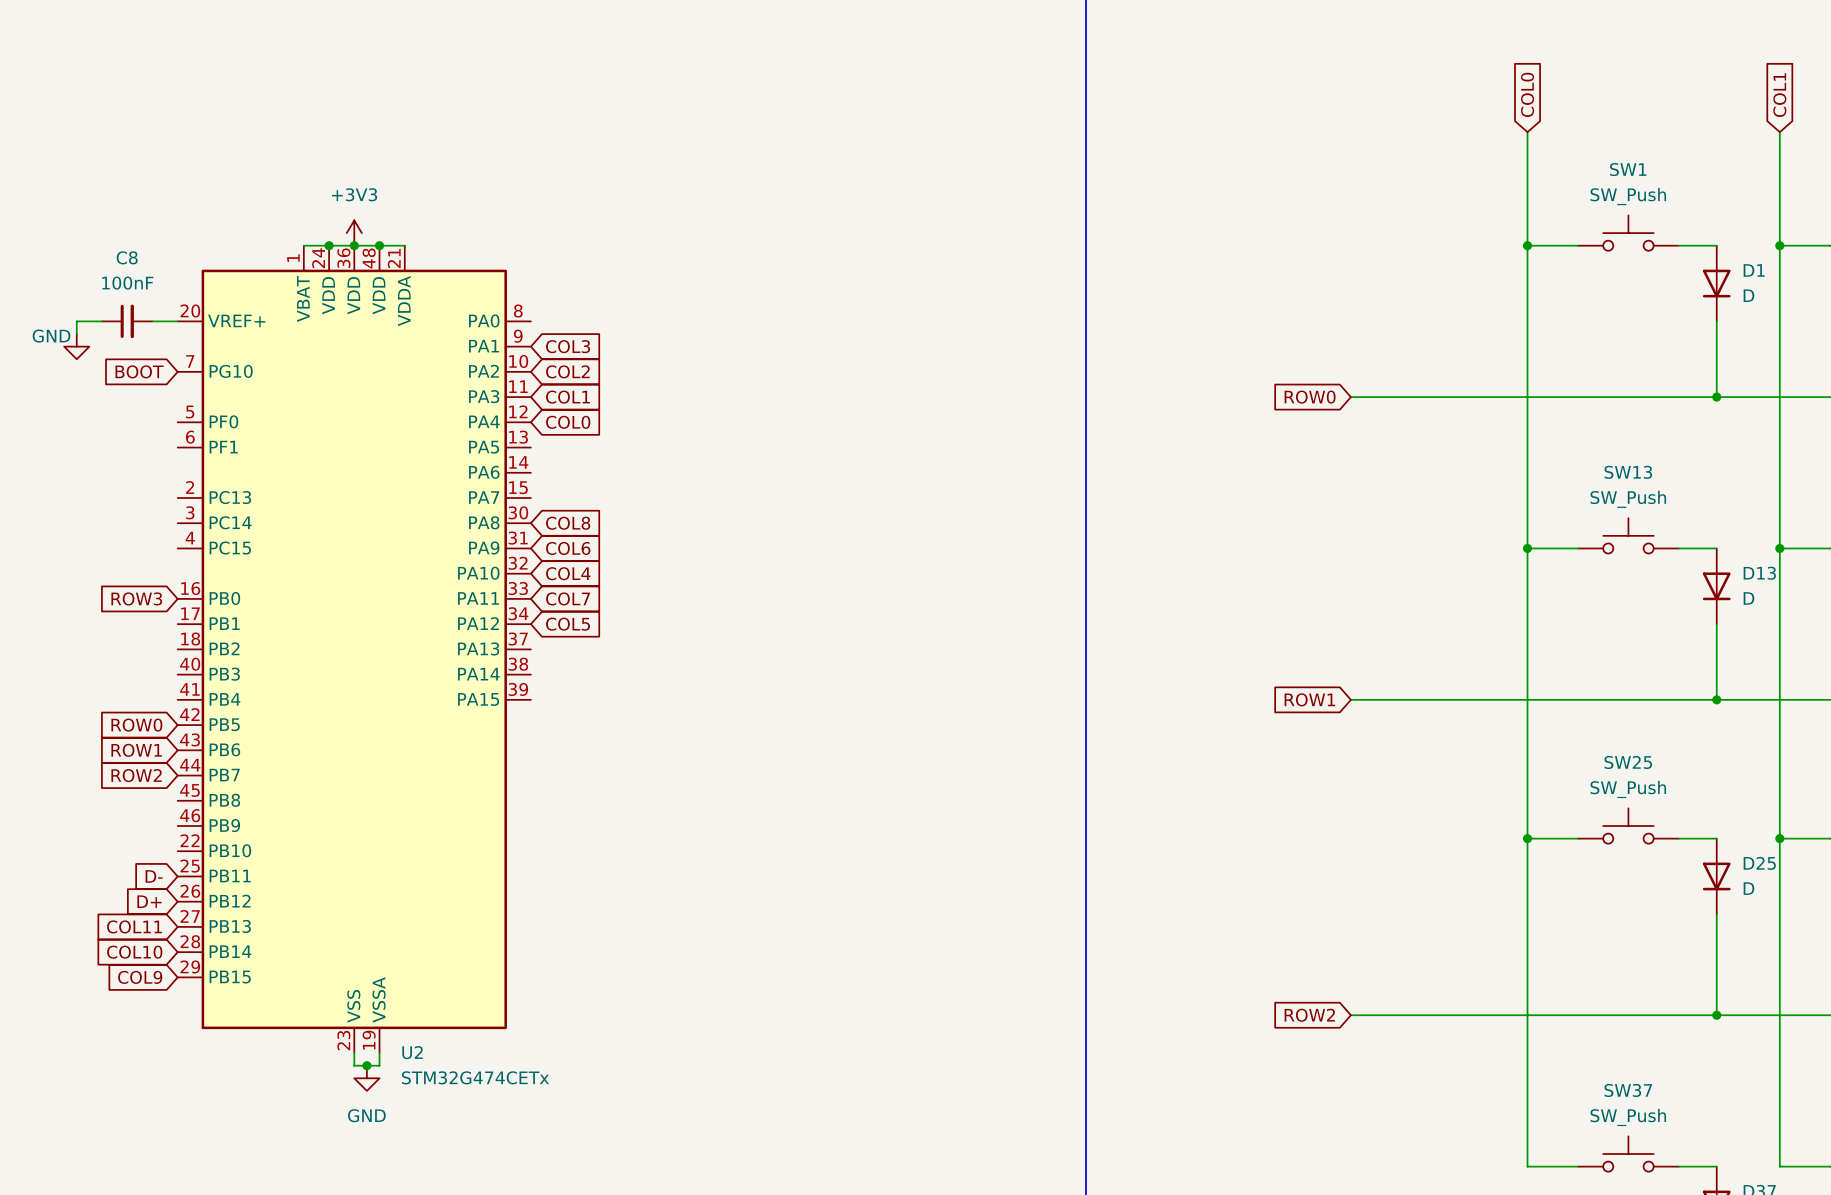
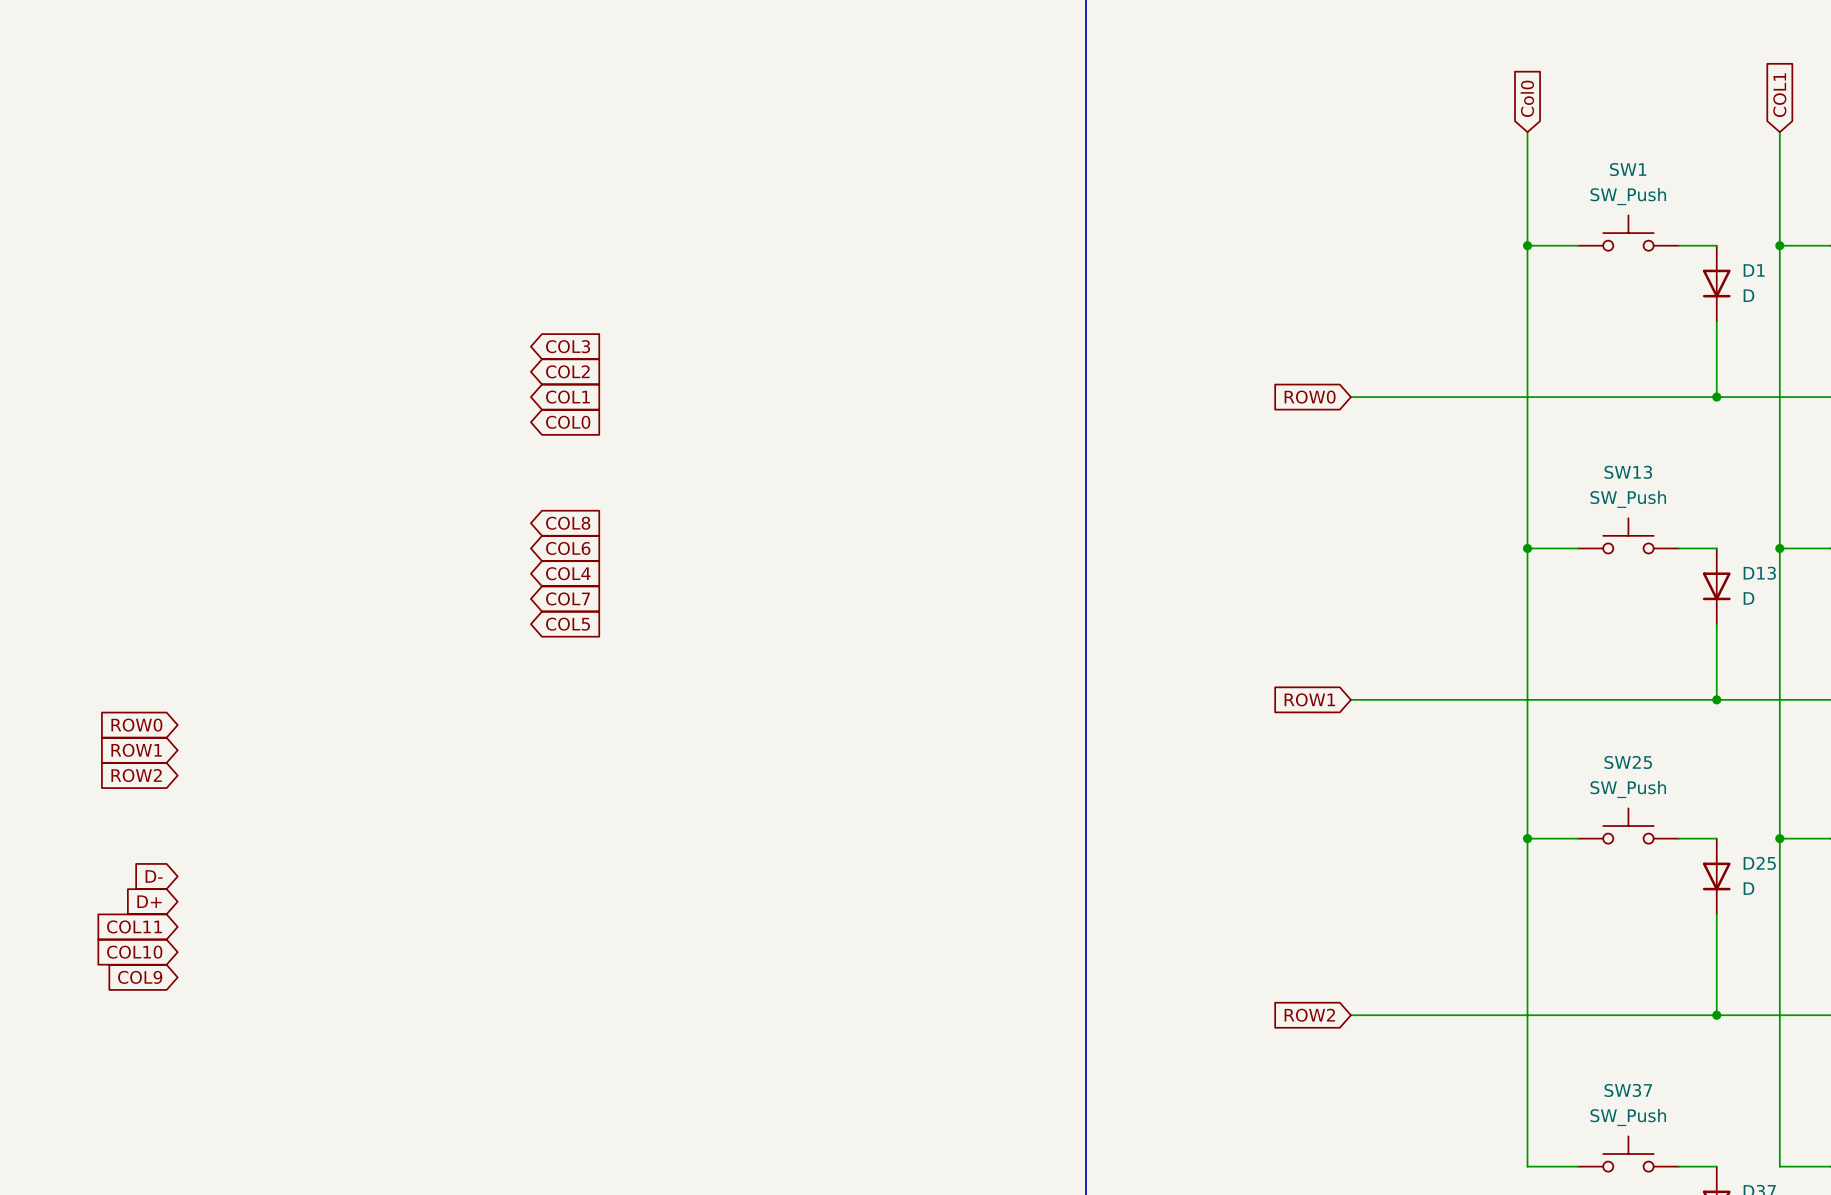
global label: COL0 (1527, 94) -> Col0 (1527, 98)
power symbol: +3V3 (354, 233) -> none
wire: (303, 245) (404, 245) -> none
junction: (329, 245) -> none
junction: (354, 245) -> none
junction: (379, 245) -> none
wire: (101, 321) (76, 321) (76, 334) -> none
C8: 100nF (127, 321) -> none
wire: (152, 321) (177, 321) -> none
power symbol: GND (76, 346) -> none
global label: BOOT (139, 371) -> none
global label: ROW3 (136, 598) -> none
U2: STM32G474CETx (354, 649) -> none
wire: (354, 1053) (354, 1065) (379, 1065) (379, 1053) -> none
junction: (366, 1065) -> none
power symbol: GND (366, 1078) -> none

